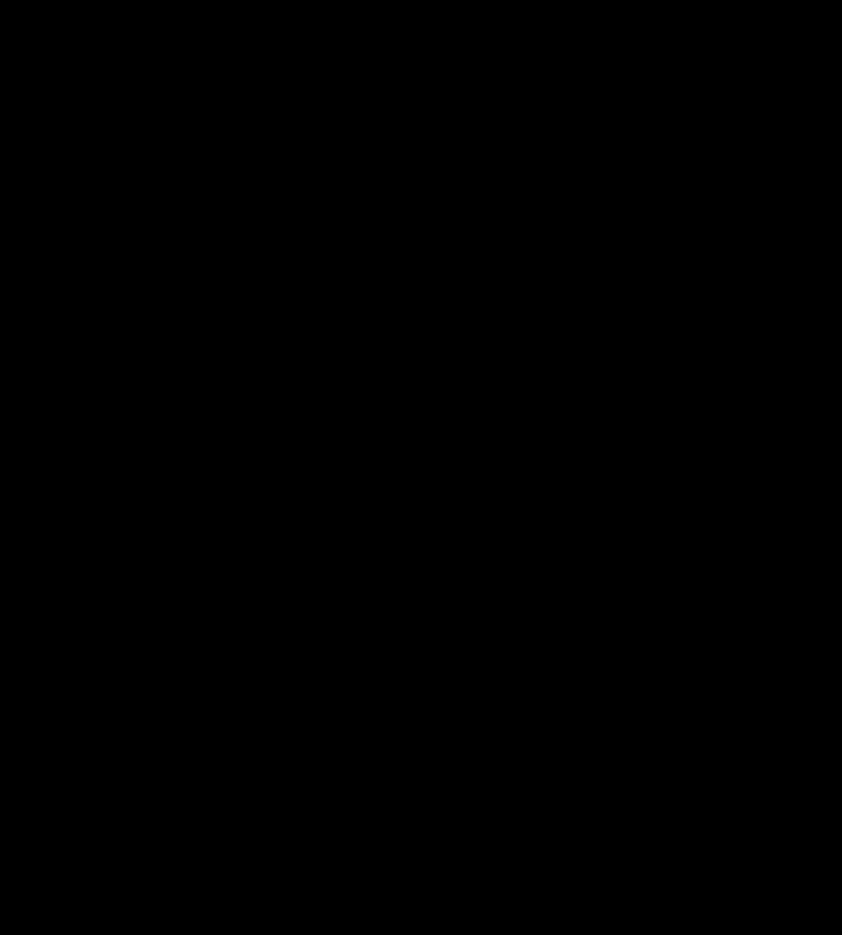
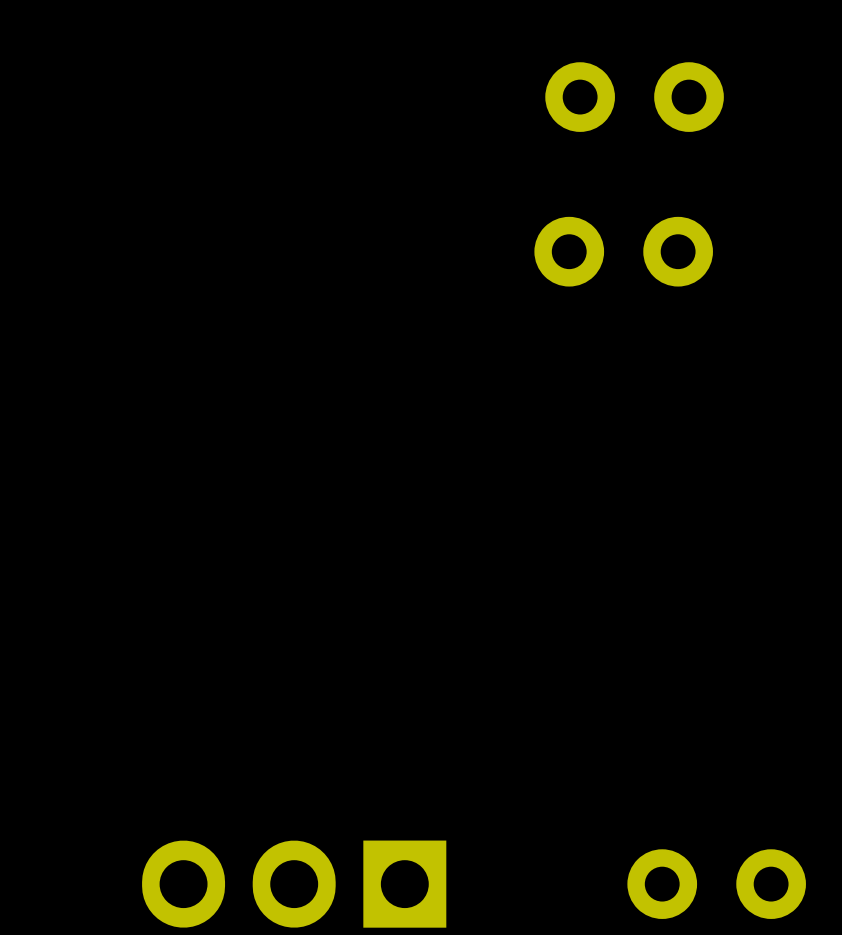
part: none -> (634, 97)
part: none -> (623, 251)
part: none -> (294, 884)
part: none -> (716, 884)

